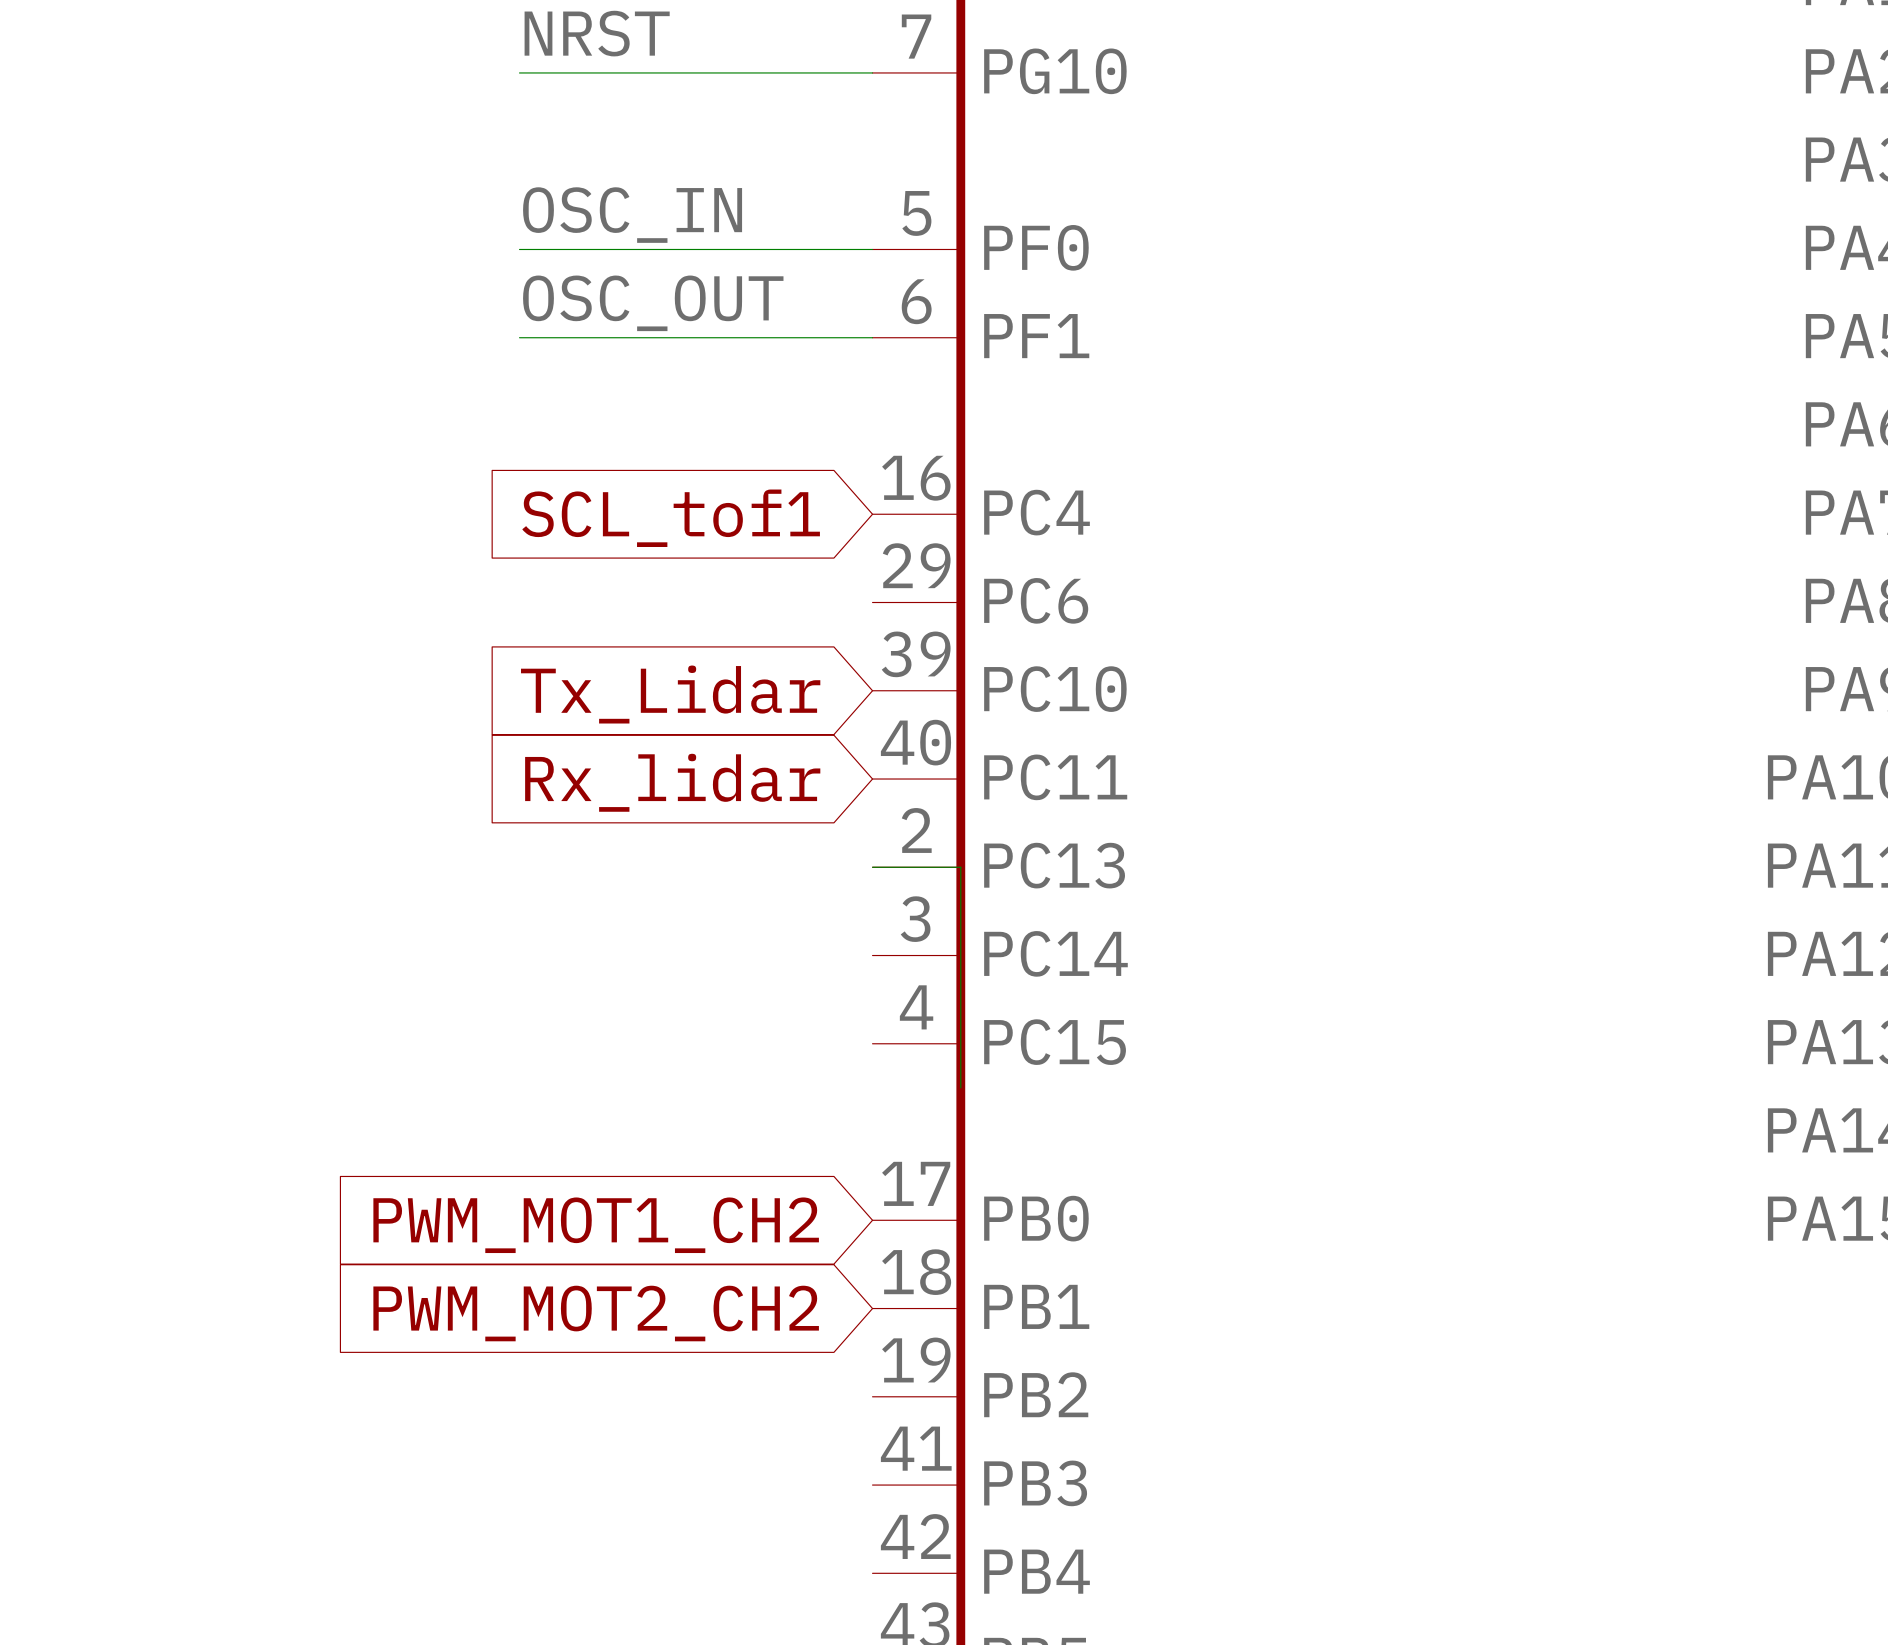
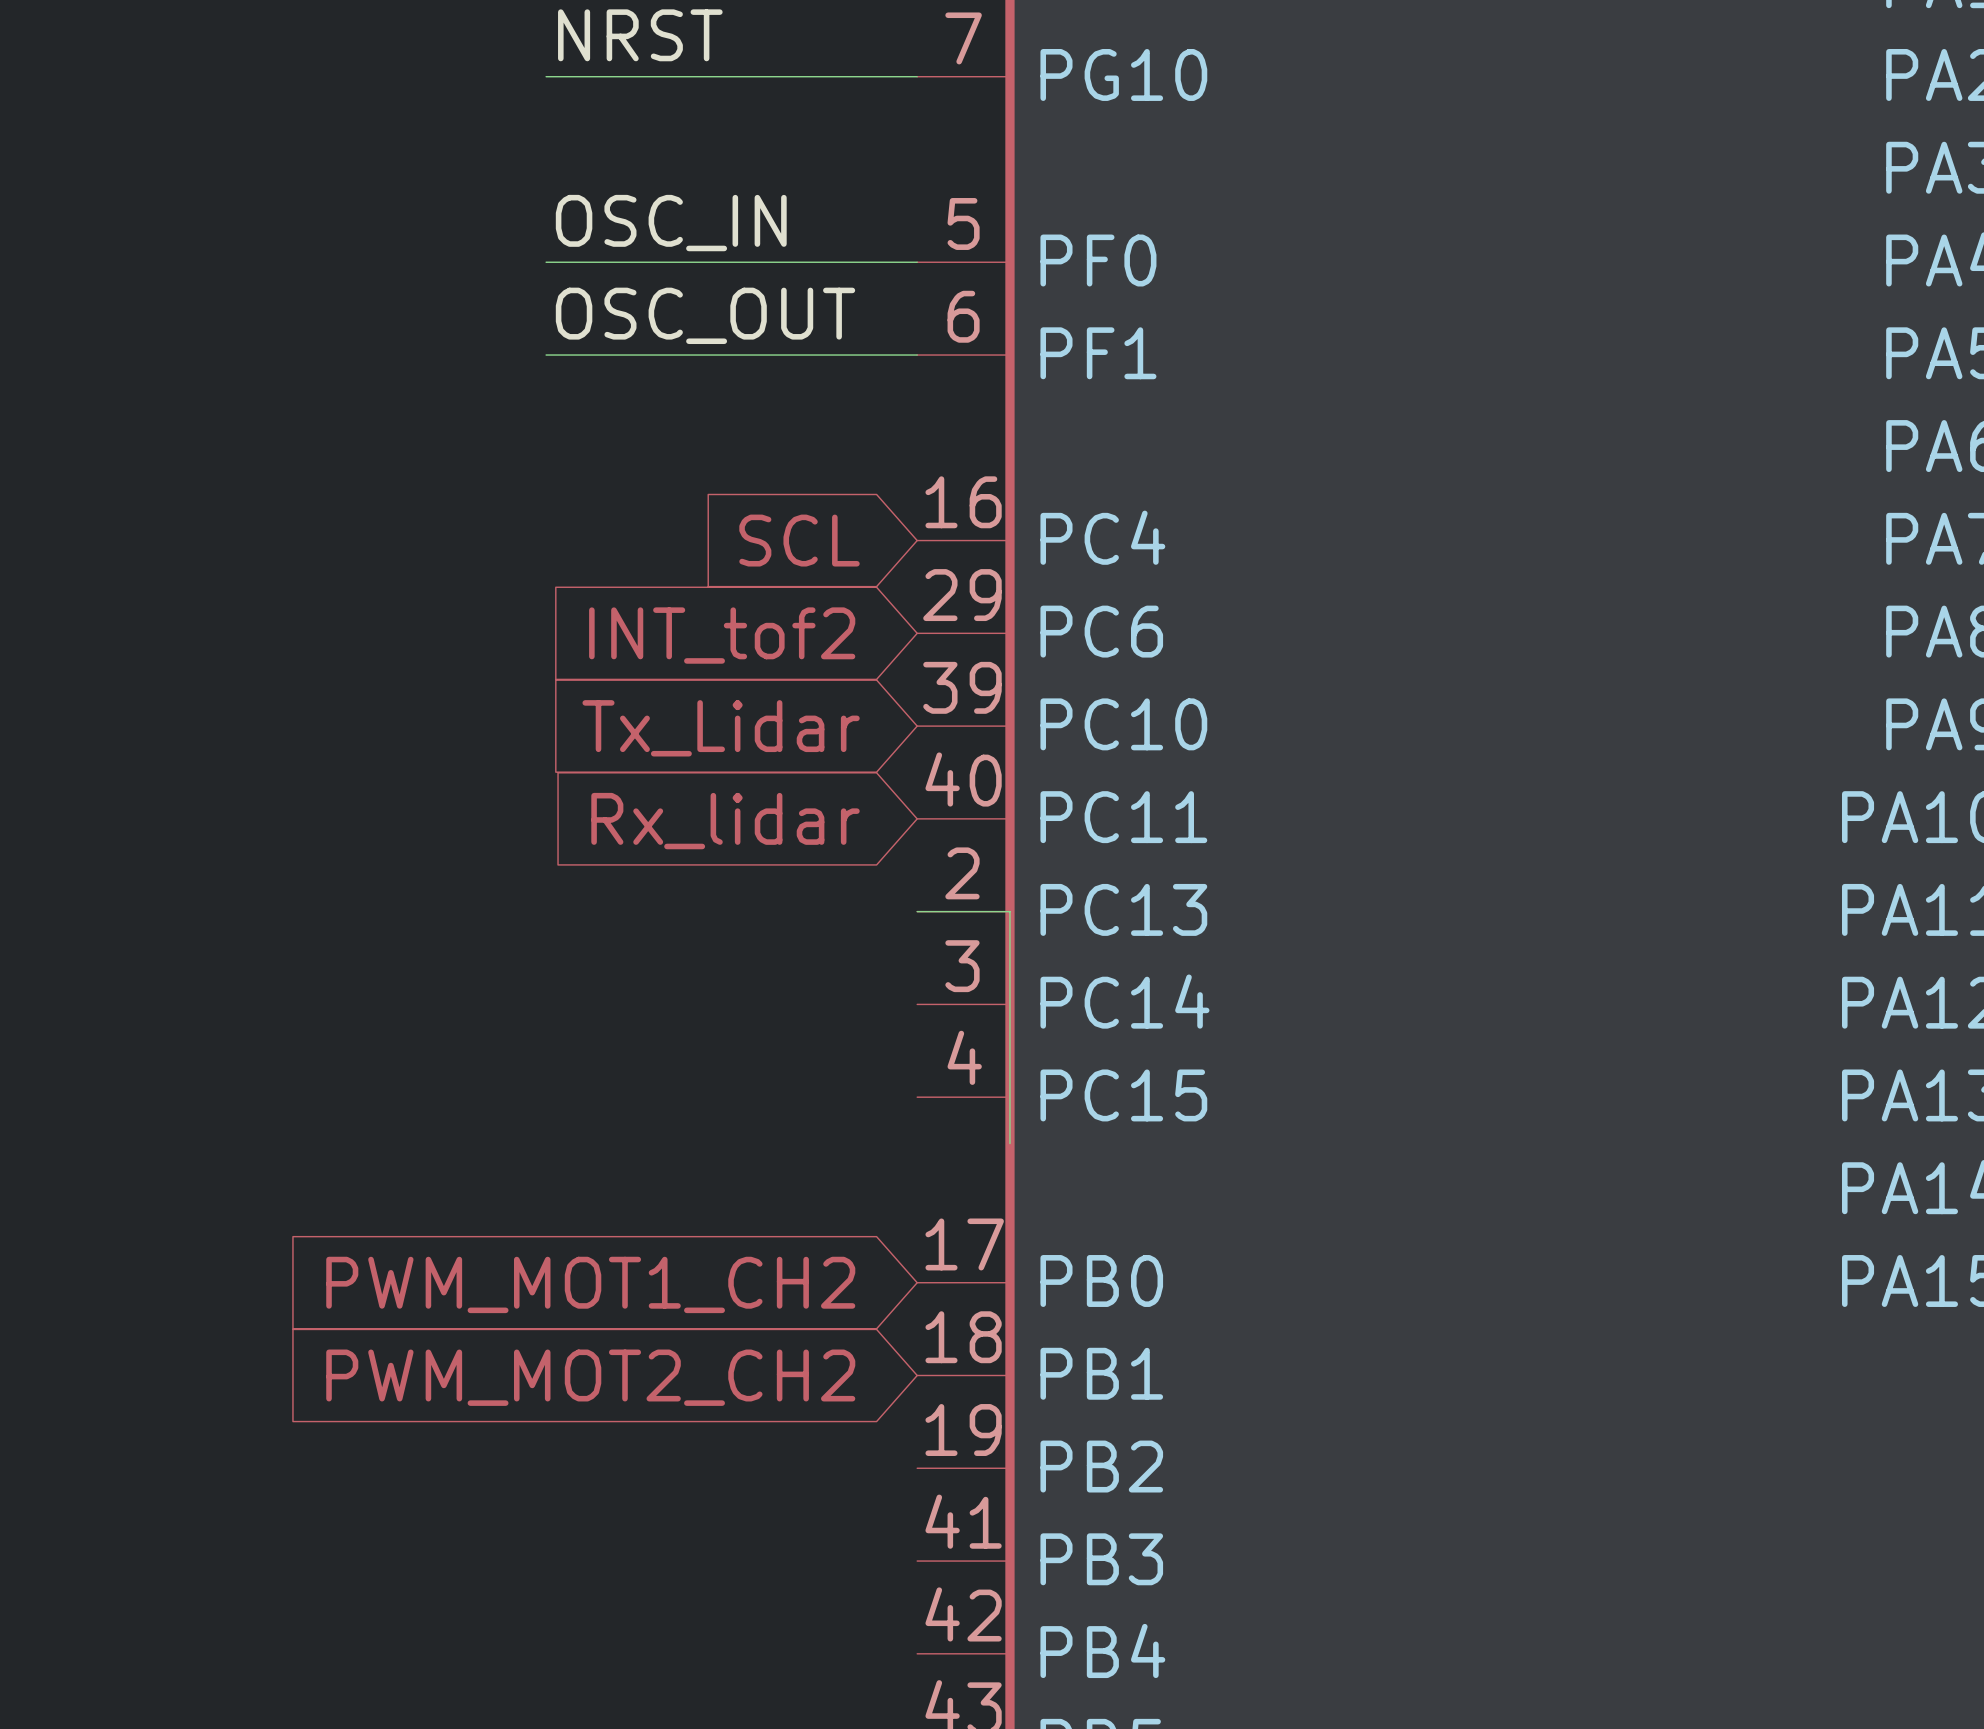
global label: SCL_tof1 (671, 518) -> SCL (799, 540)
global label: none -> INT_tof2 (722, 635)

